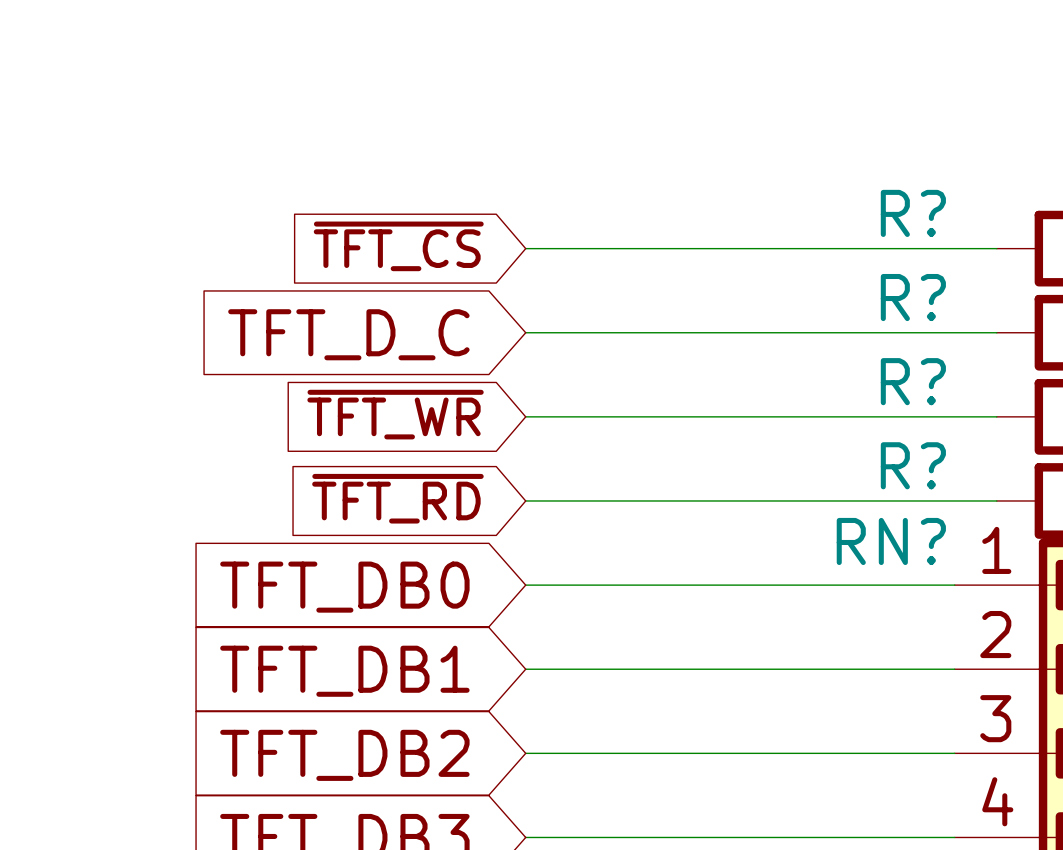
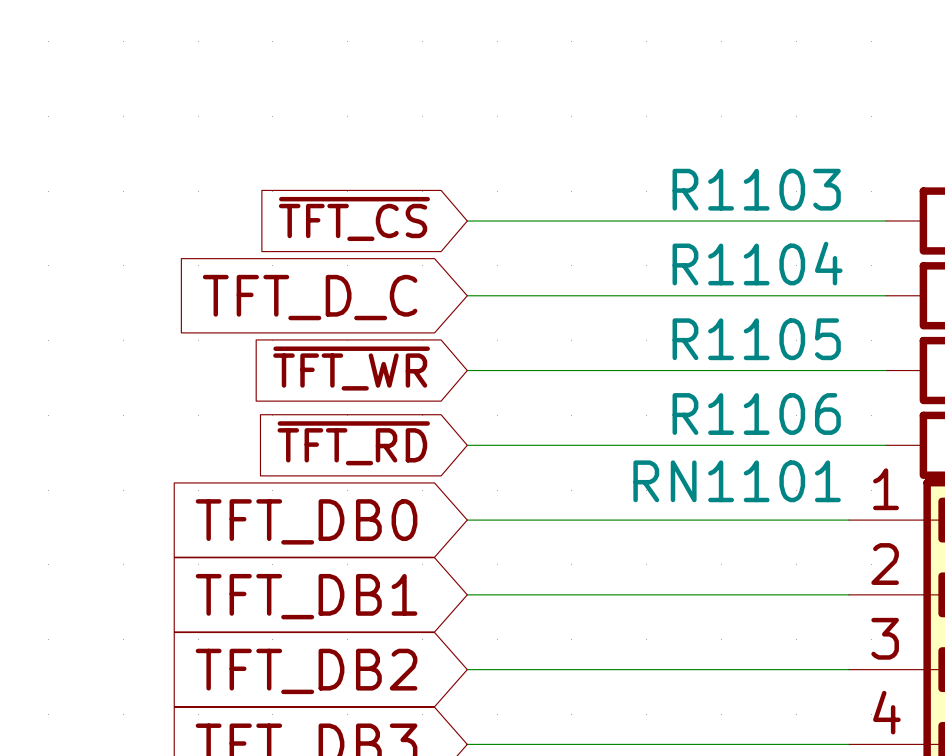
R? name: R? (913, 213) -> R1103 (756, 189)
R? name: R? (913, 297) -> R1104 (757, 263)
R? name: R? (913, 381) -> R1105 (756, 339)
R? name: R? (913, 465) -> R1106 (756, 414)
RN? name: RN? (891, 541) -> RN1101 (737, 481)

